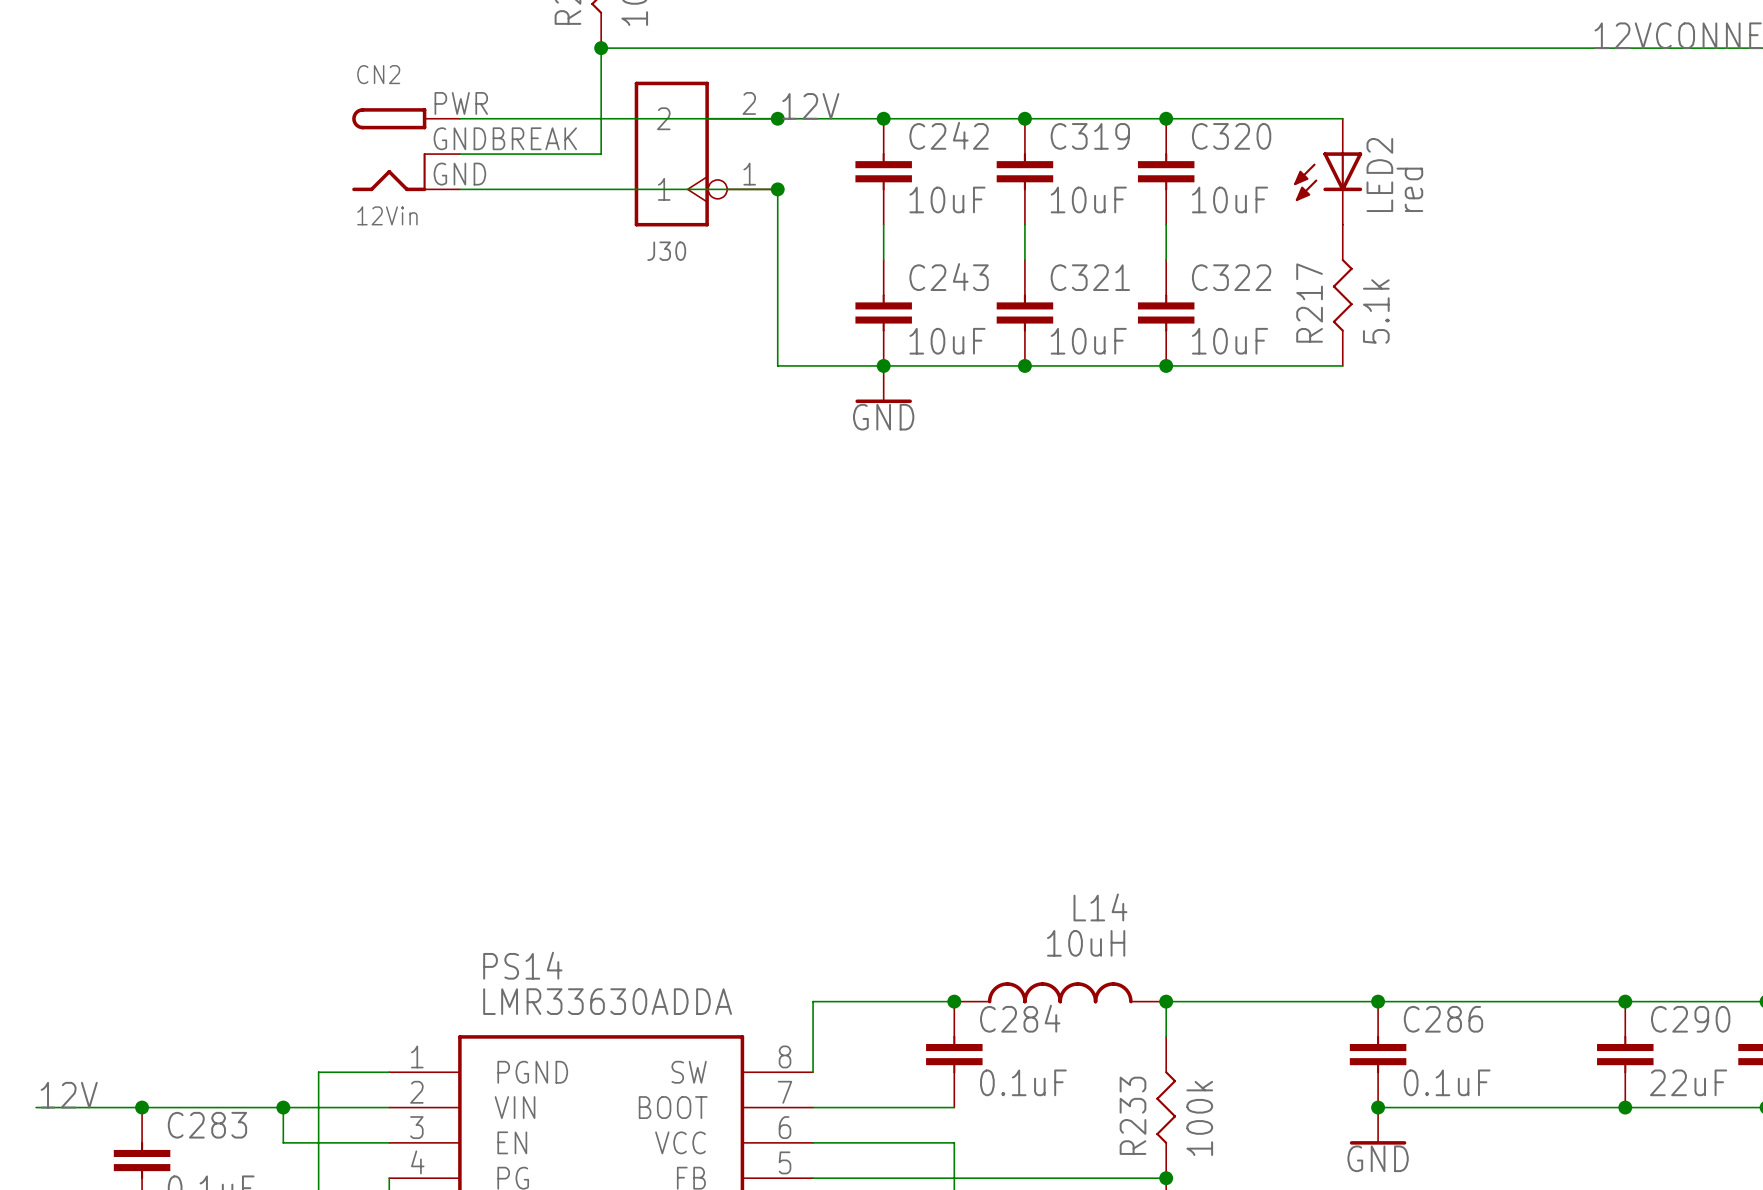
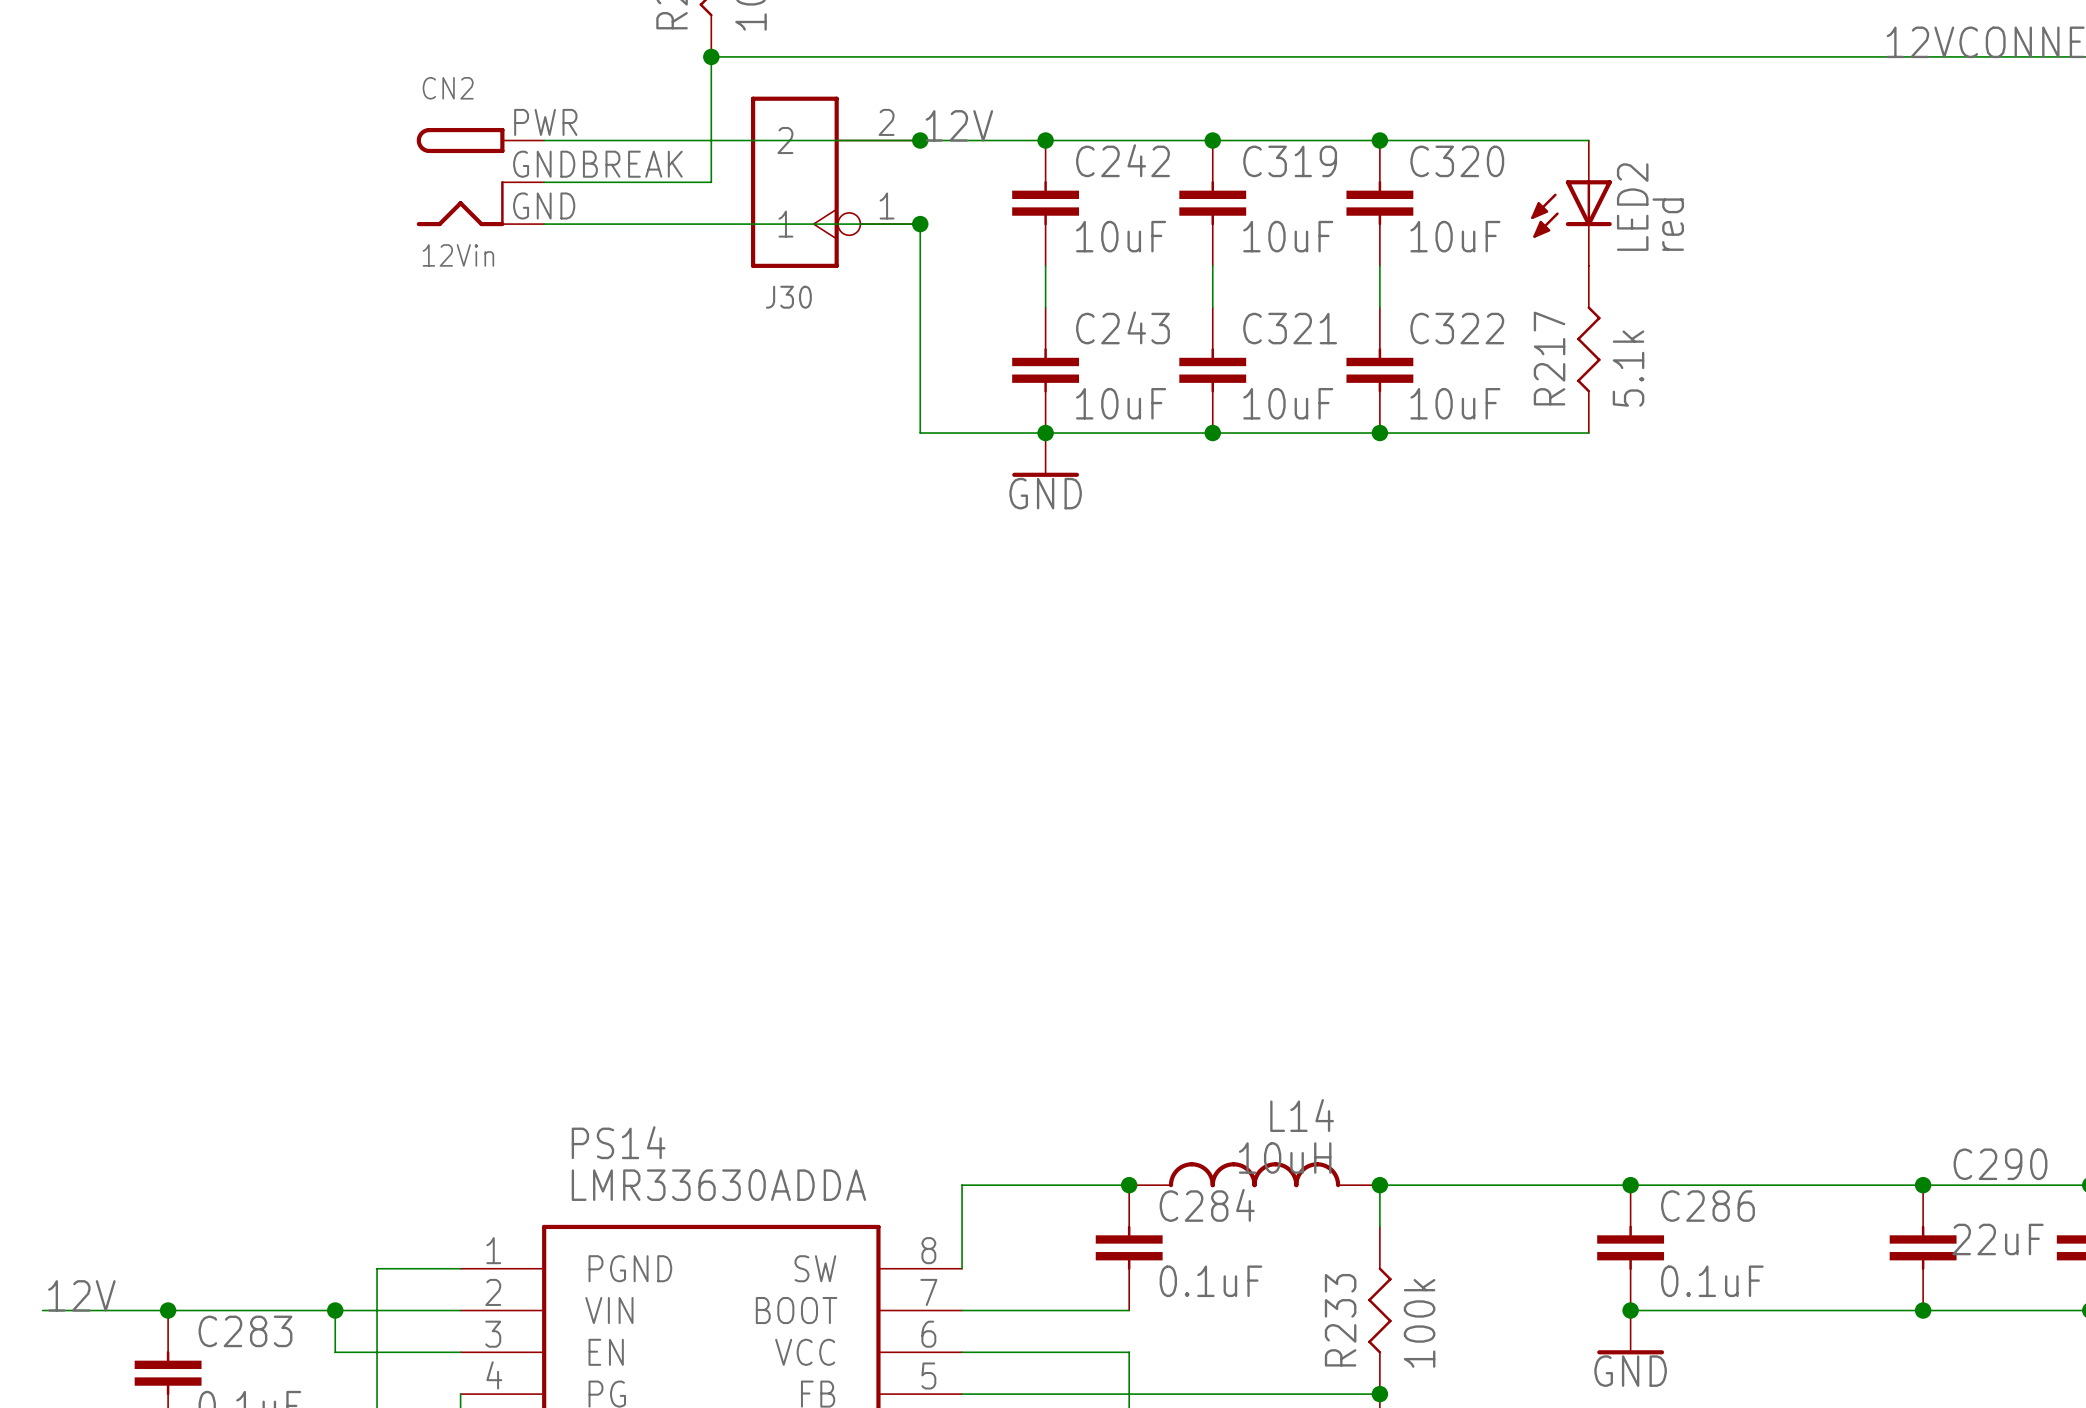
L14 name position: L14 (1100, 907) -> L14 (1302, 1115)
L14 value position: 10uH (1086, 943) -> 10uH (1285, 1158)
C290 name position: C290 (1690, 1019) -> C290 (2000, 1164)
C290 value position: 22uF (1688, 1082) -> 22uF (1997, 1239)

